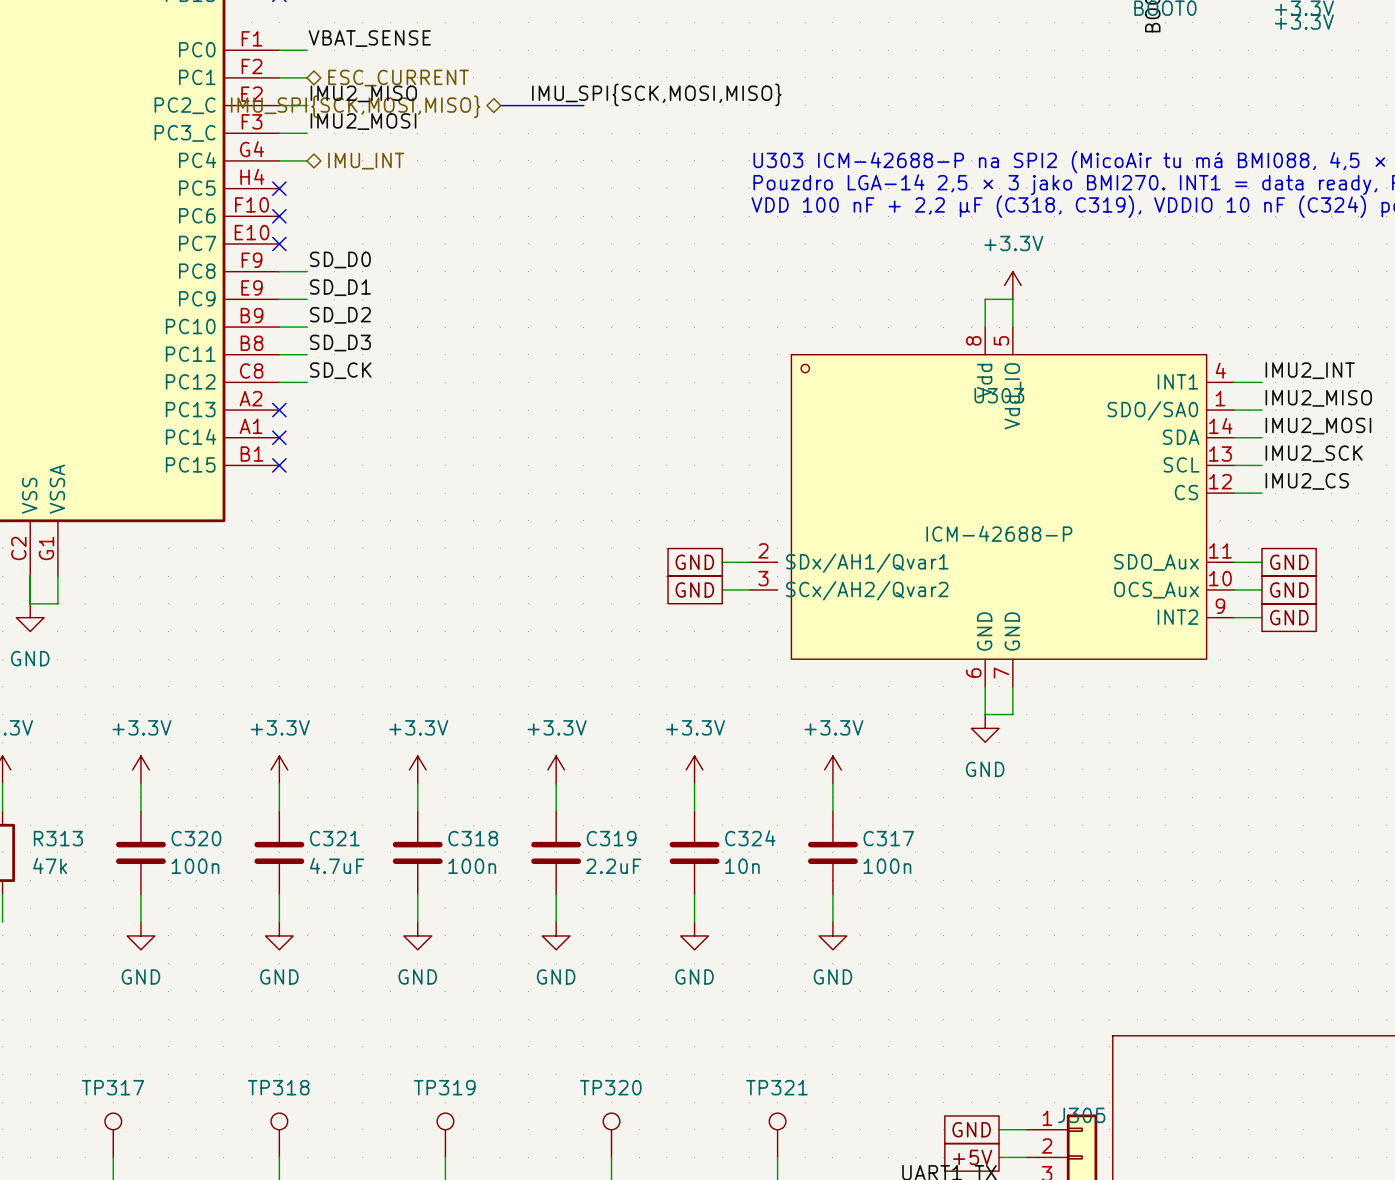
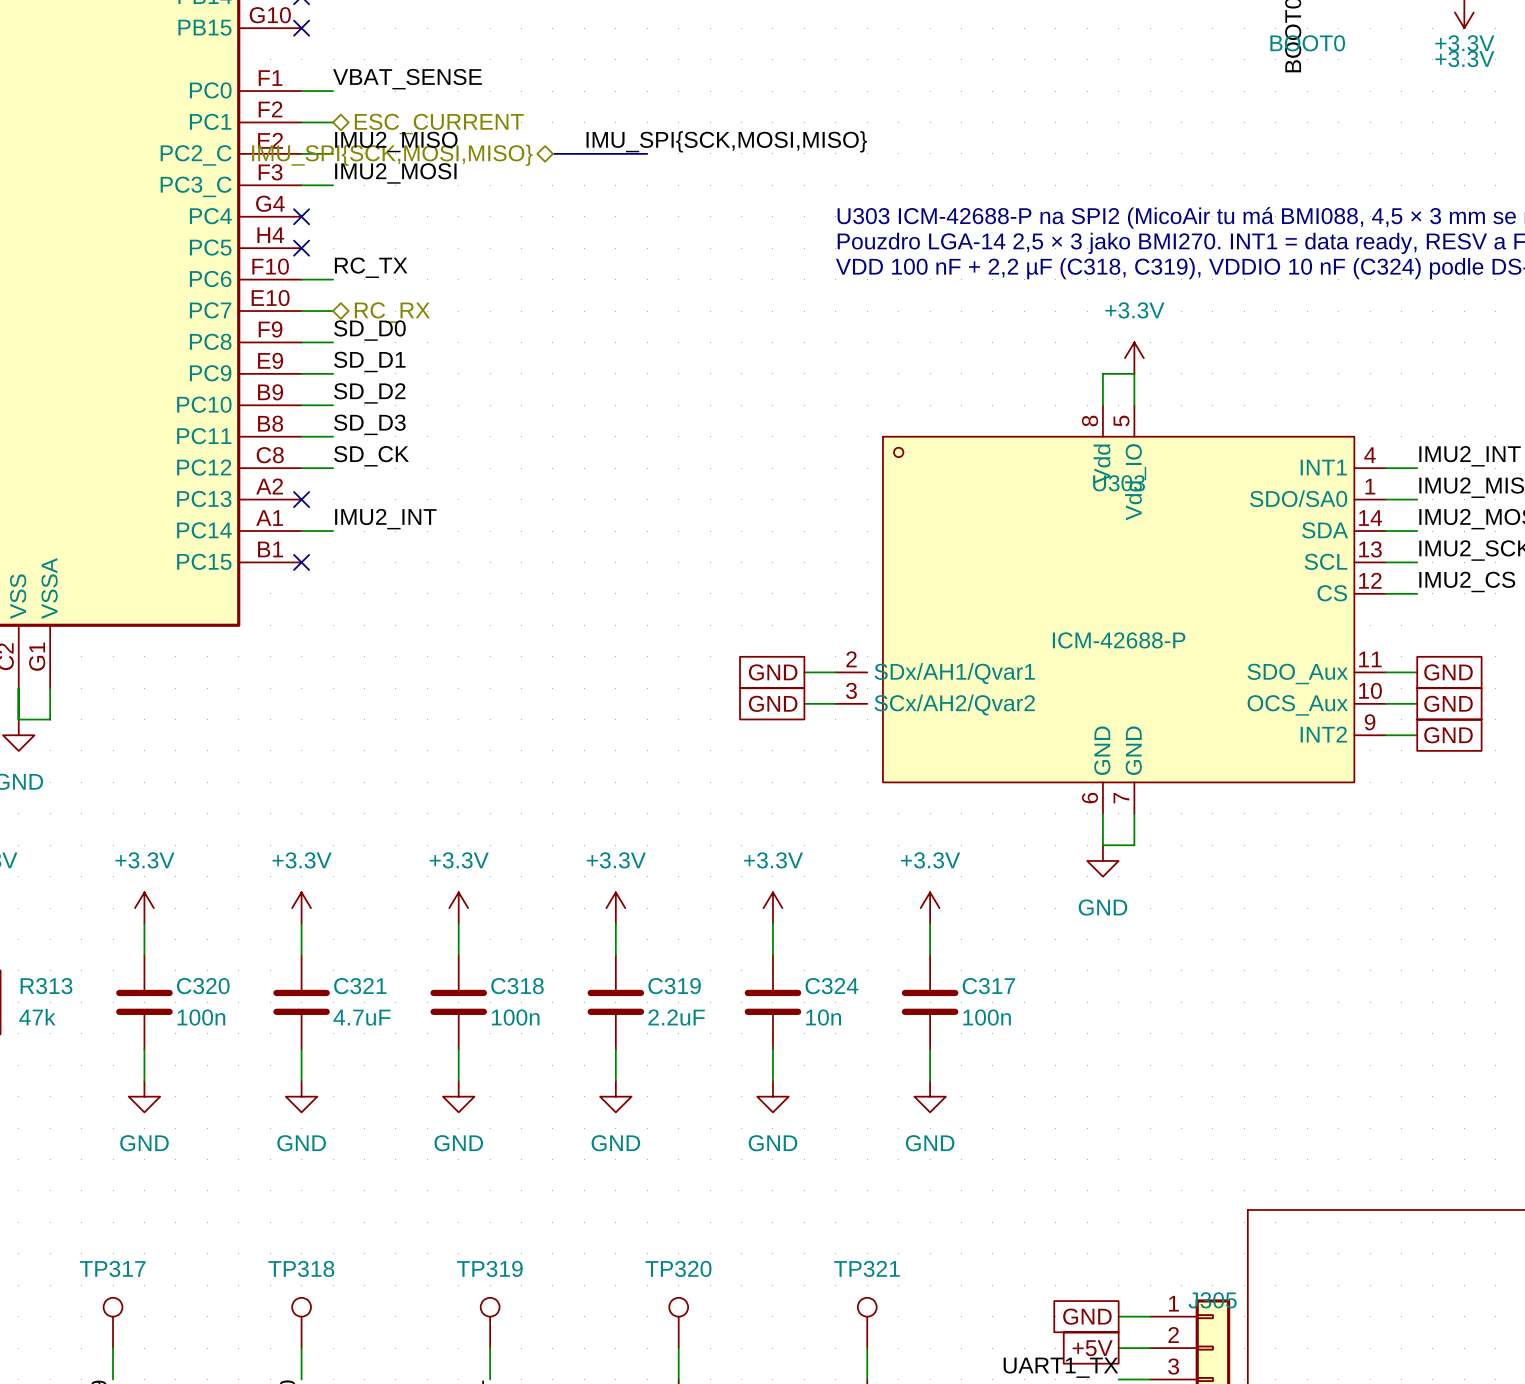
wire: (279, 160) (307, 160) -> (301, 279) (333, 279)
no-connect mark: none -> (301, 216)
hierarchical label: IMU_INT (366, 161) -> none
label: none -> RC_TX (371, 267)
no-connect mark: (279, 216) -> none
wire: none -> (301, 311) (333, 311)
no-connect mark: (279, 243) -> none
hierarchical label: none -> RC_RX (392, 312)
label: none -> IMU2_INT (385, 519)
wire: none -> (301, 531) (333, 531)
no-connect mark: (279, 437) -> none

